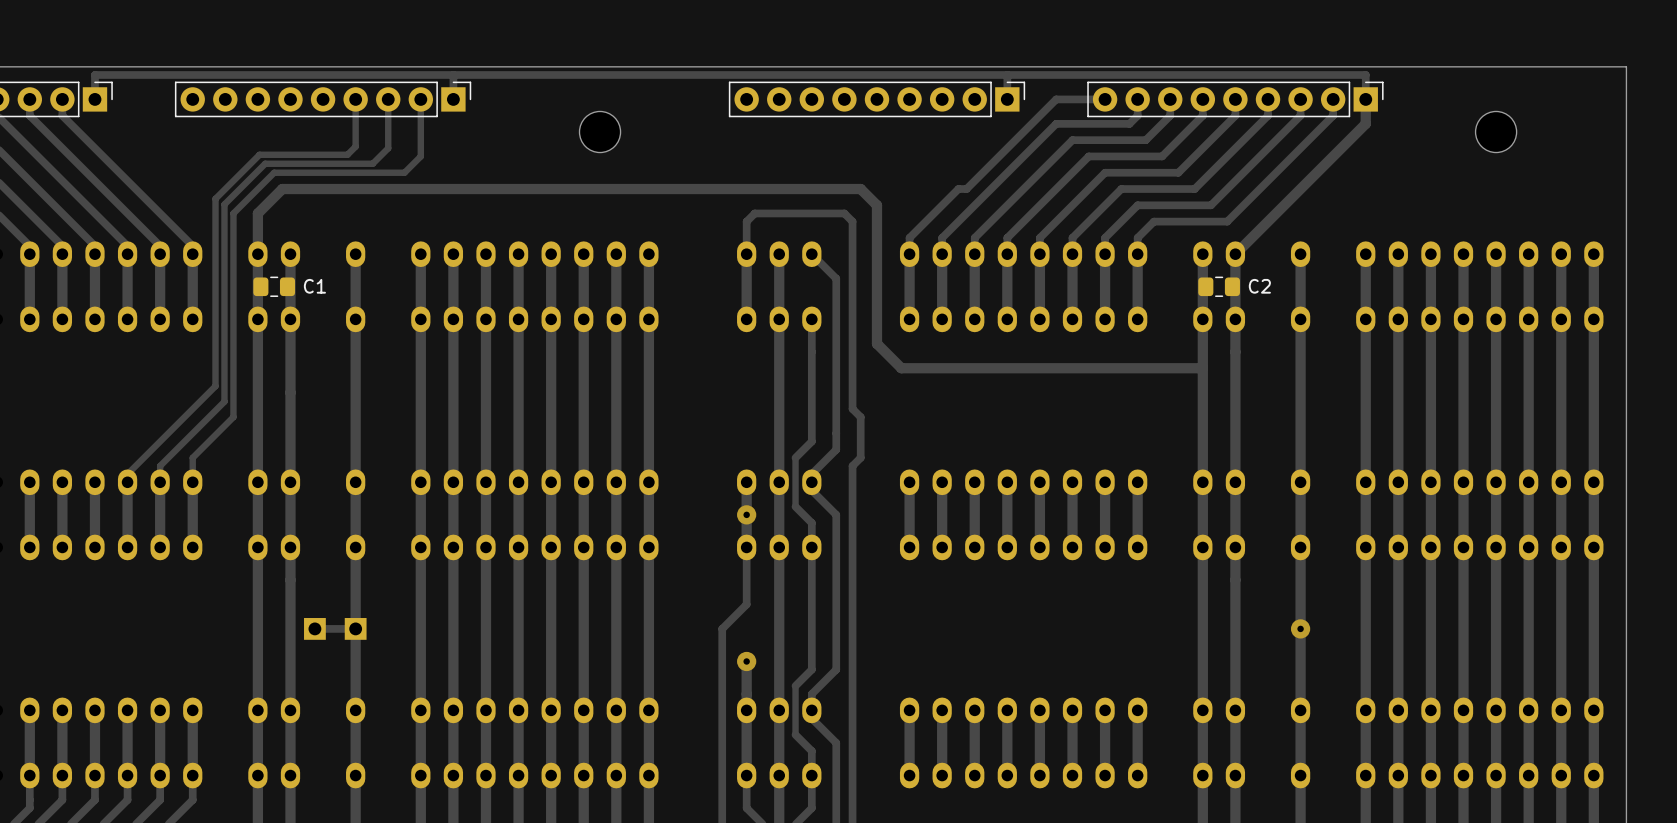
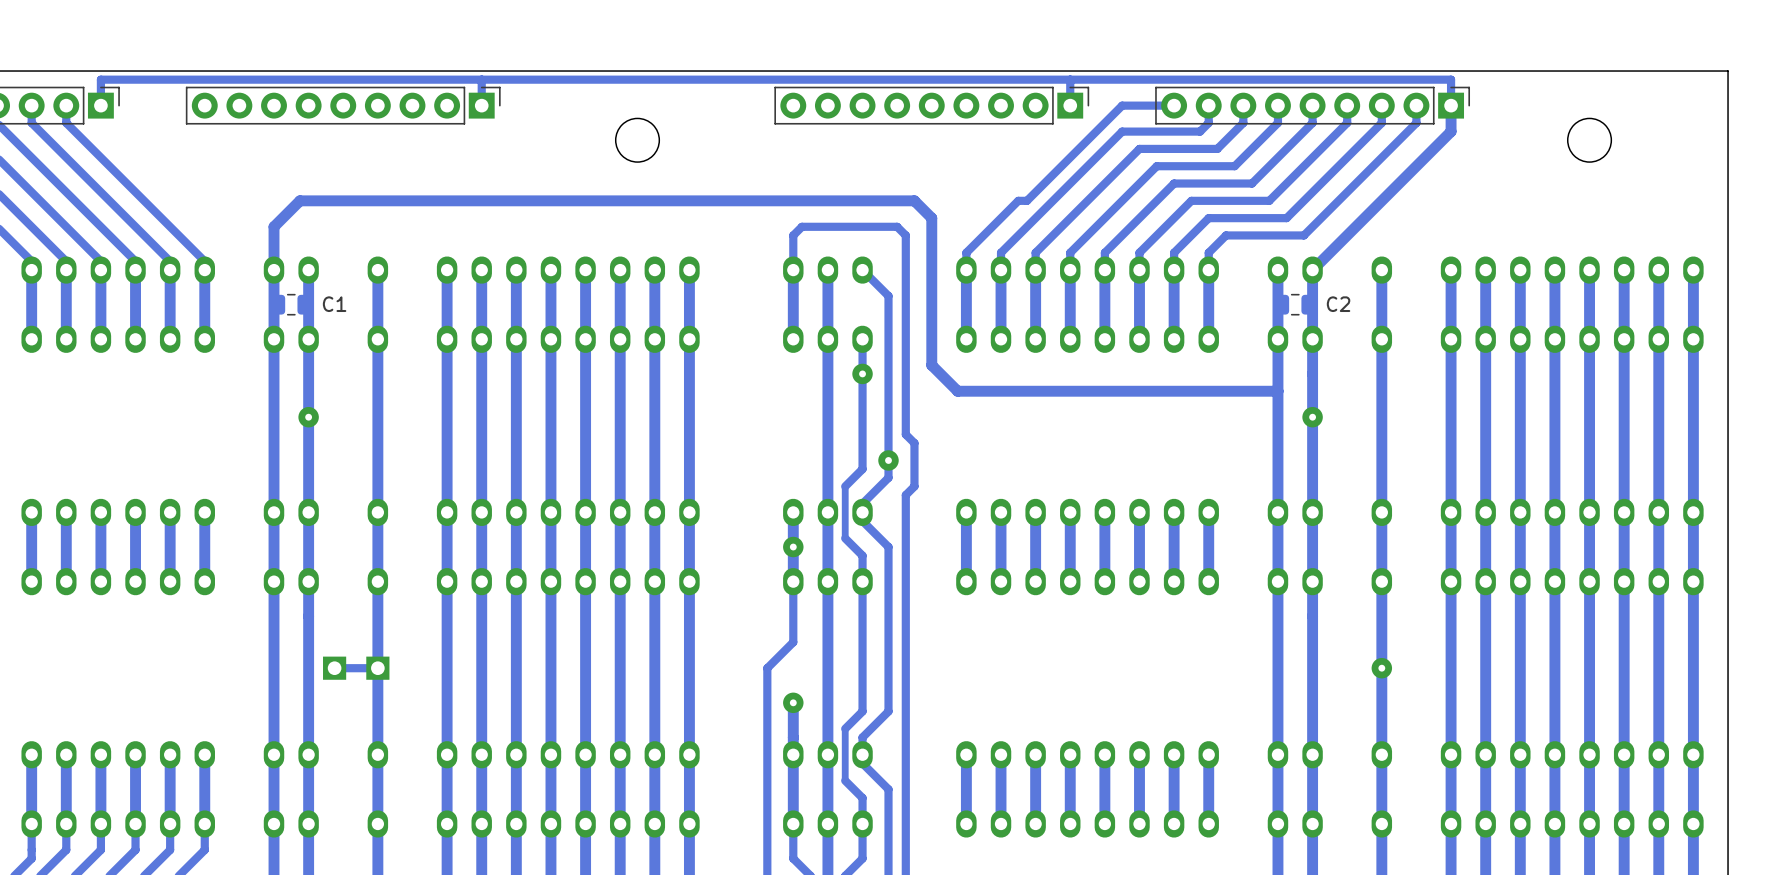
track: (355, 99) (355, 146) (347, 154) (259, 154) (215, 198) (215, 386) (127, 474) (127, 482) -> none
track: (388, 99) (388, 148) (372, 163) (265, 163) (224, 204) (224, 401) (160, 465) (160, 482) -> none
track: (420, 99) (420, 156) (404, 172) (274, 172) (233, 213) (233, 417) (192, 457) (192, 482) -> none
via: none -> (862, 373)
via: none -> (308, 417)
via: none -> (1312, 417)
via: none -> (888, 460)

